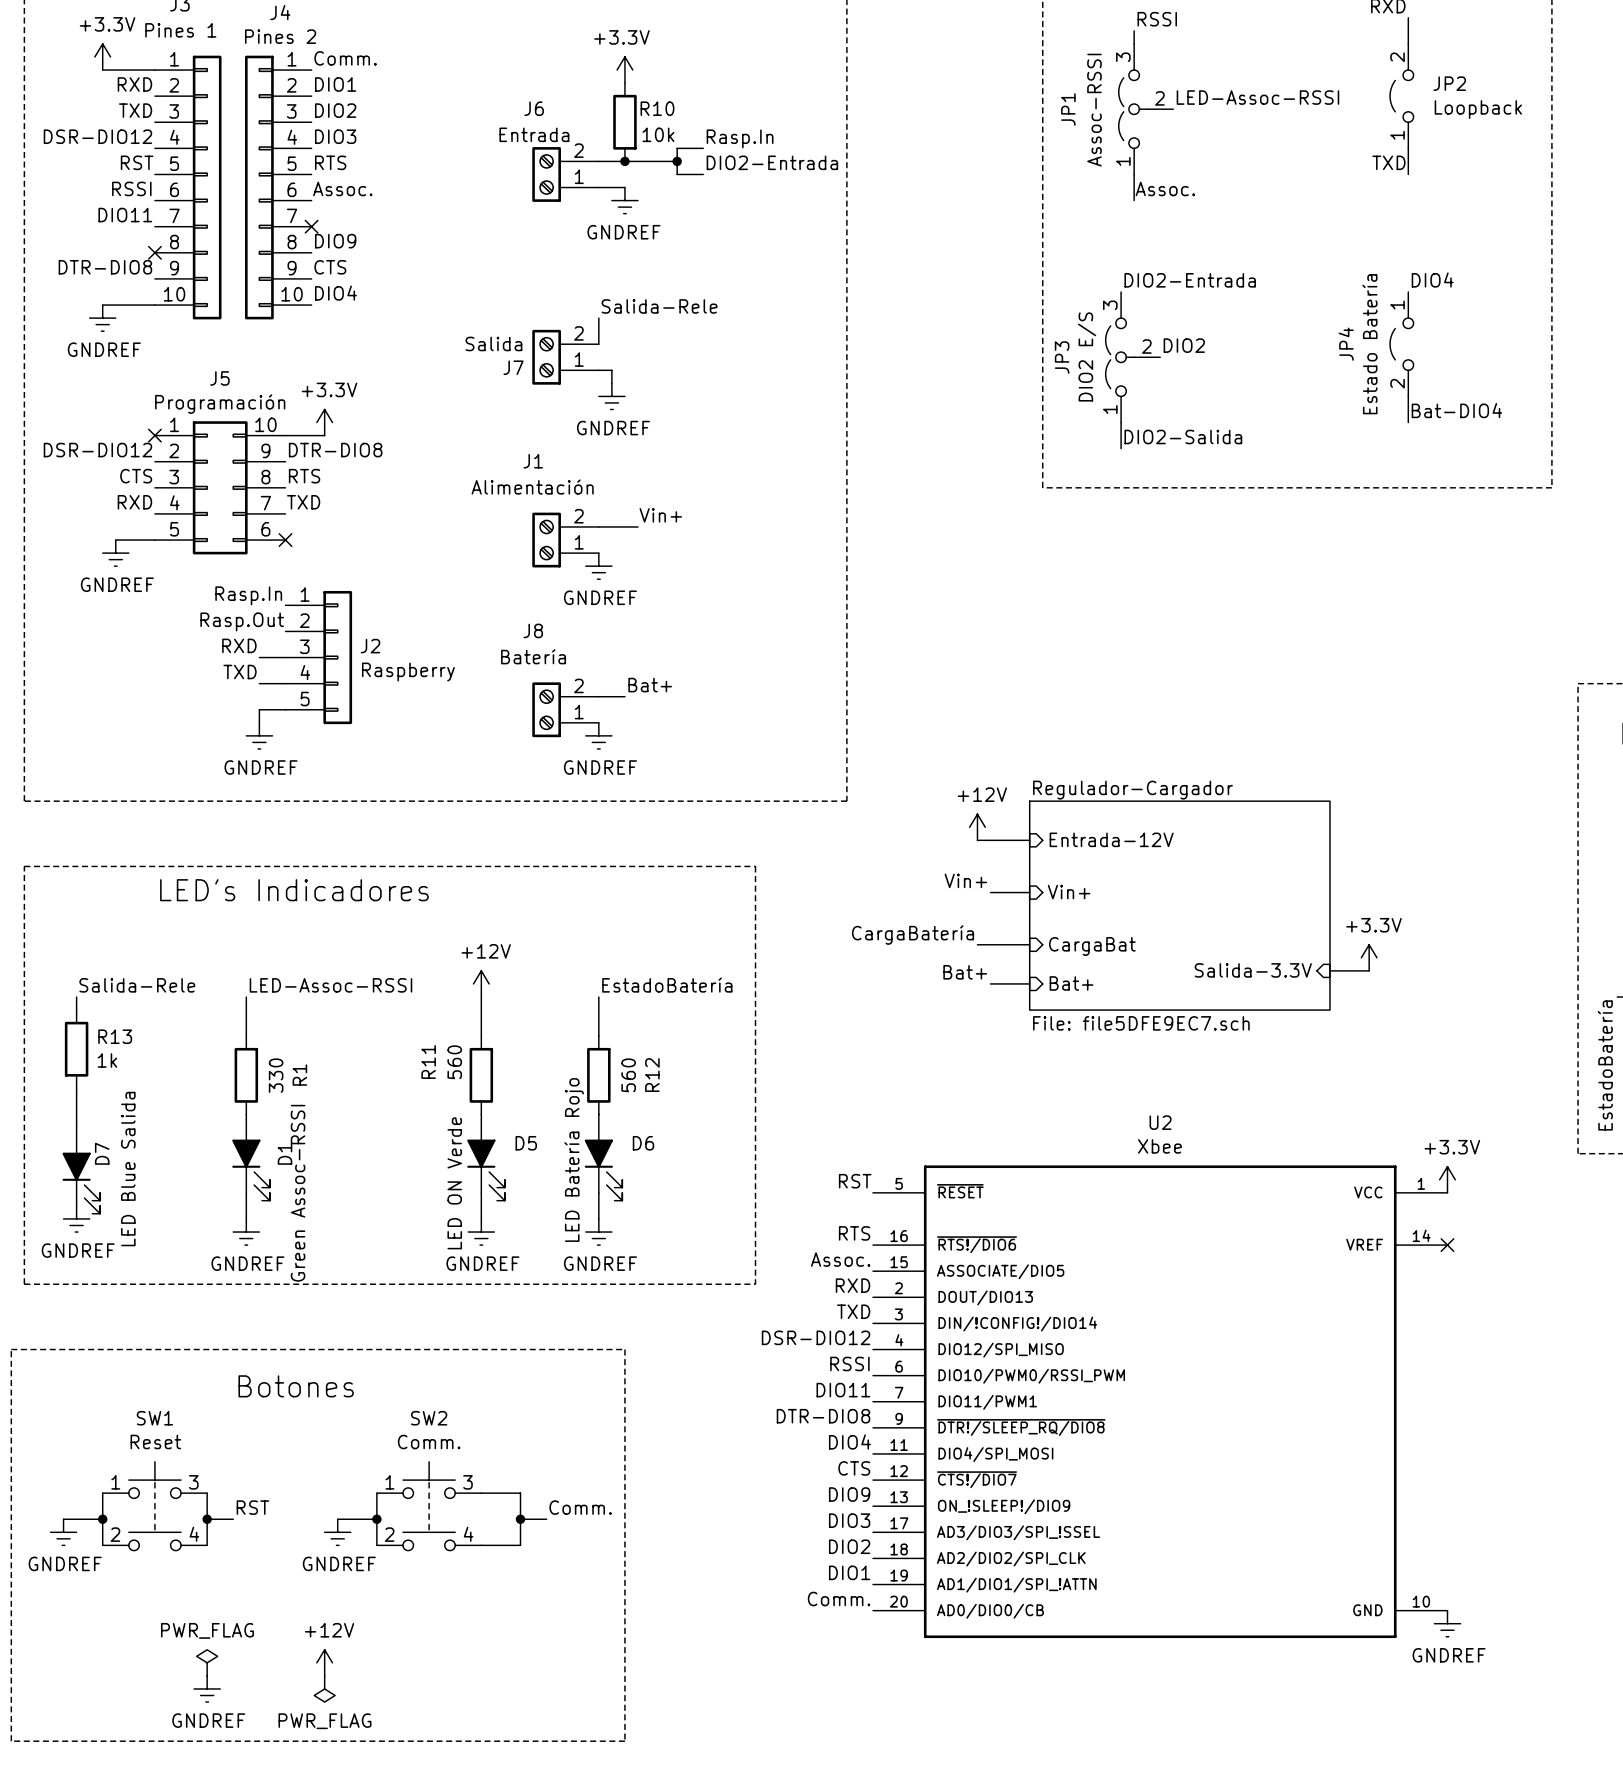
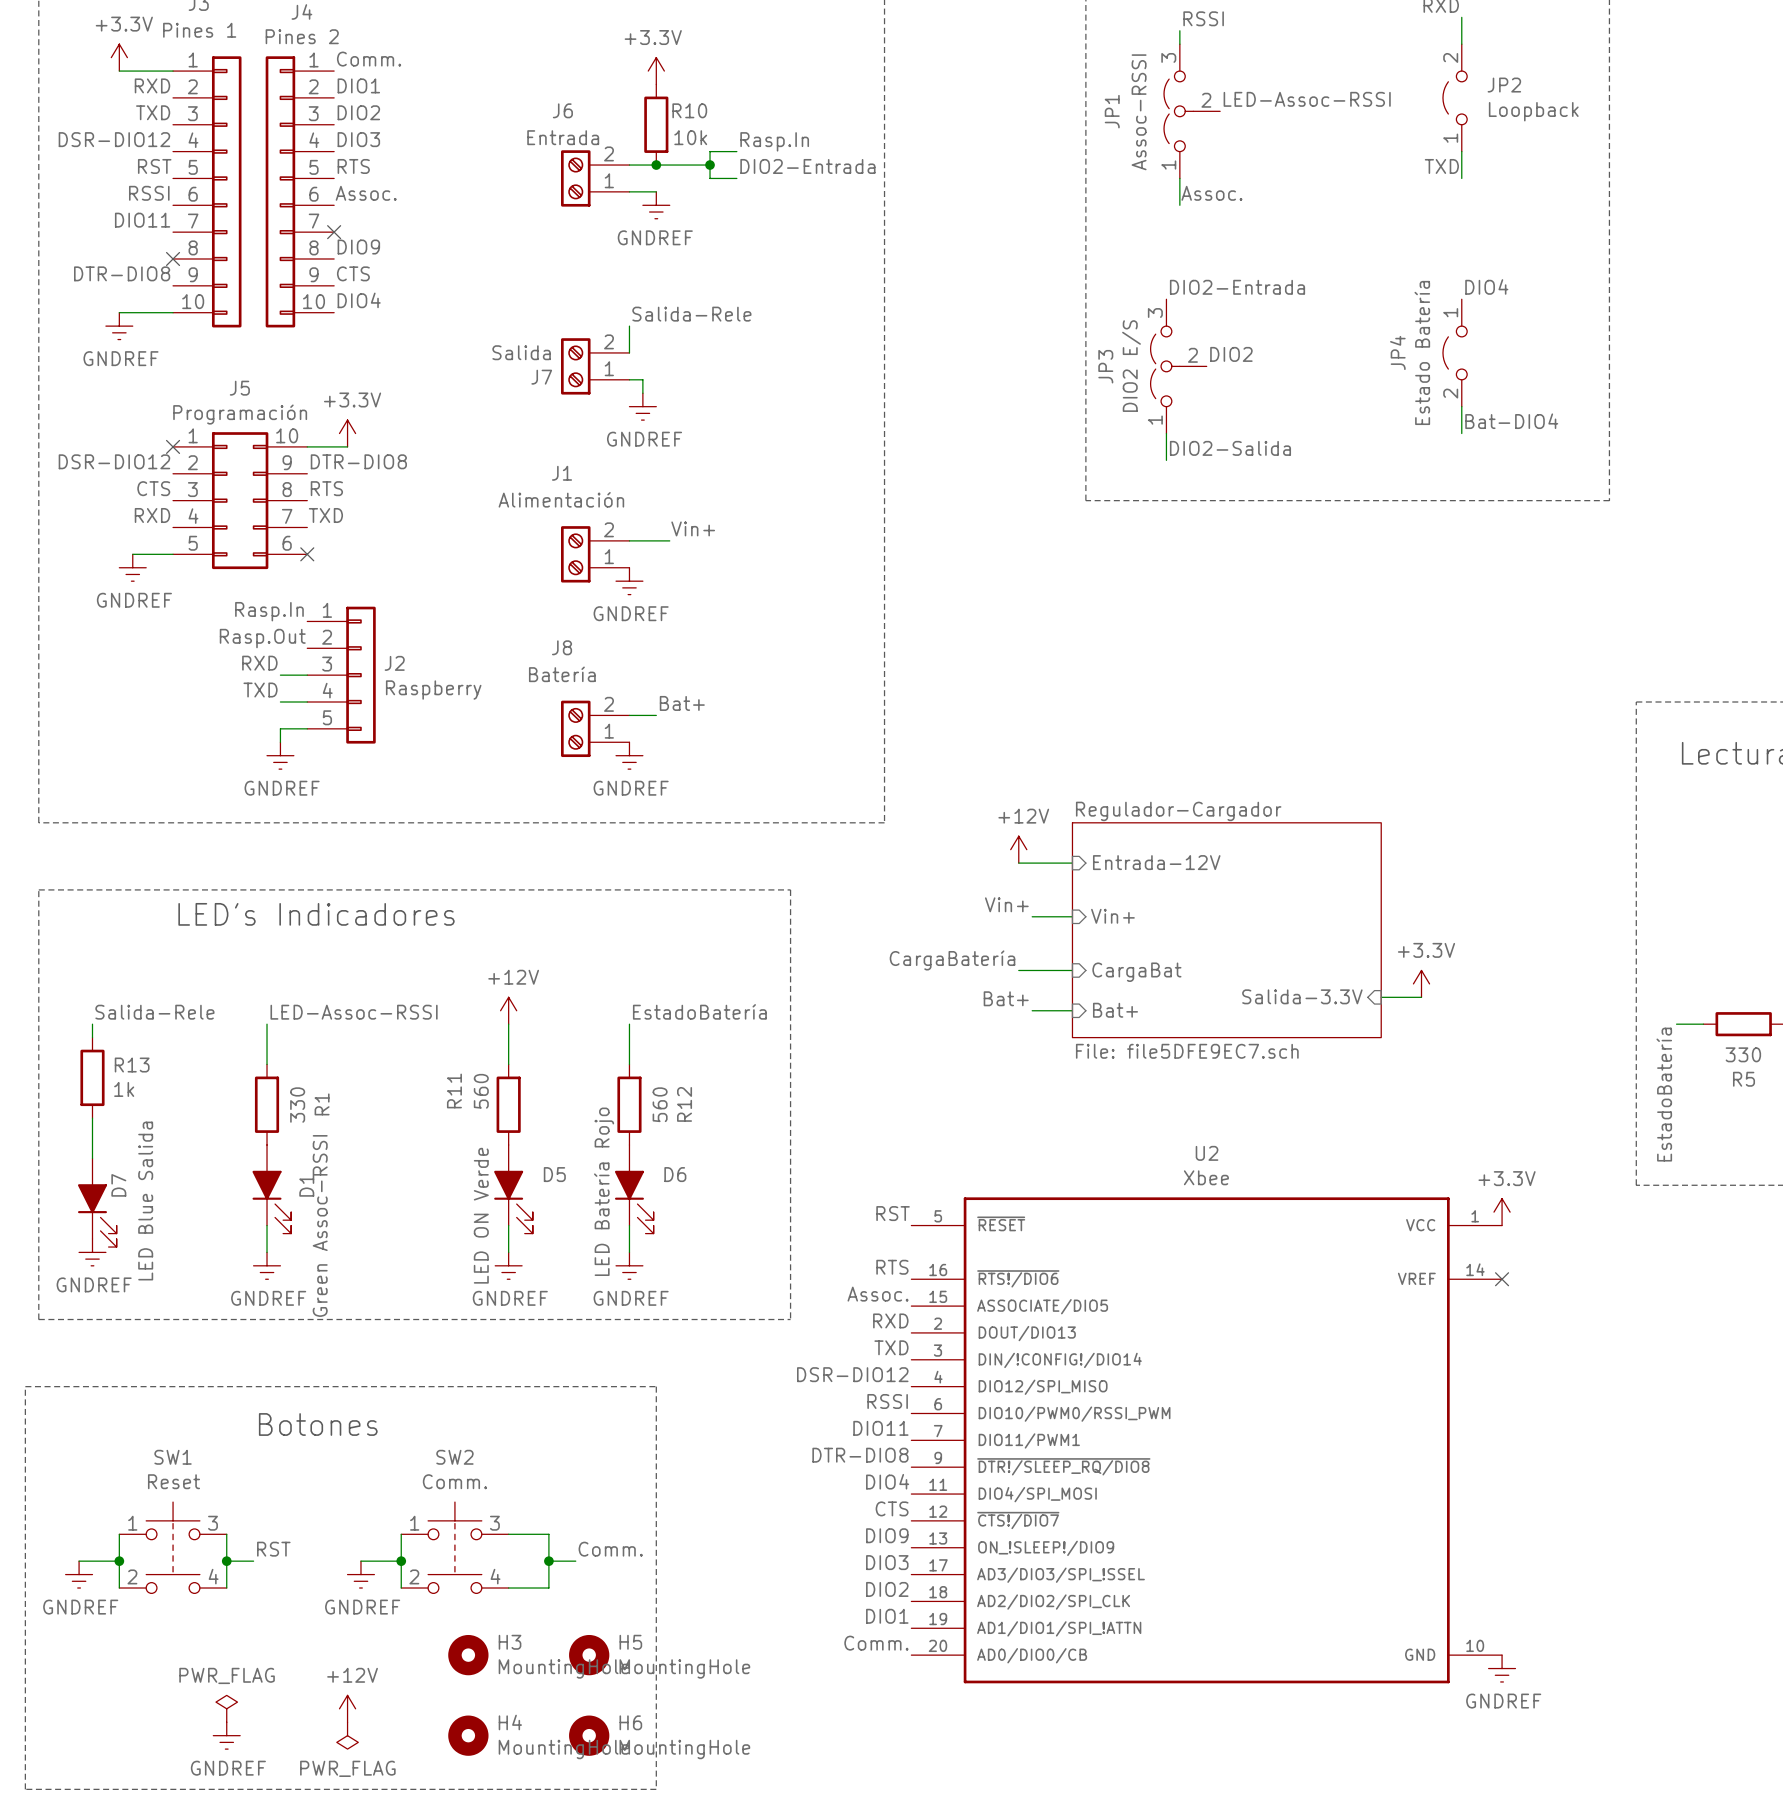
H3: none -> MountingHole (468, 1655)
H5: none -> MountingHole (589, 1655)
H4: none -> MountingHole (468, 1735)
H6: none -> MountingHole (589, 1735)

